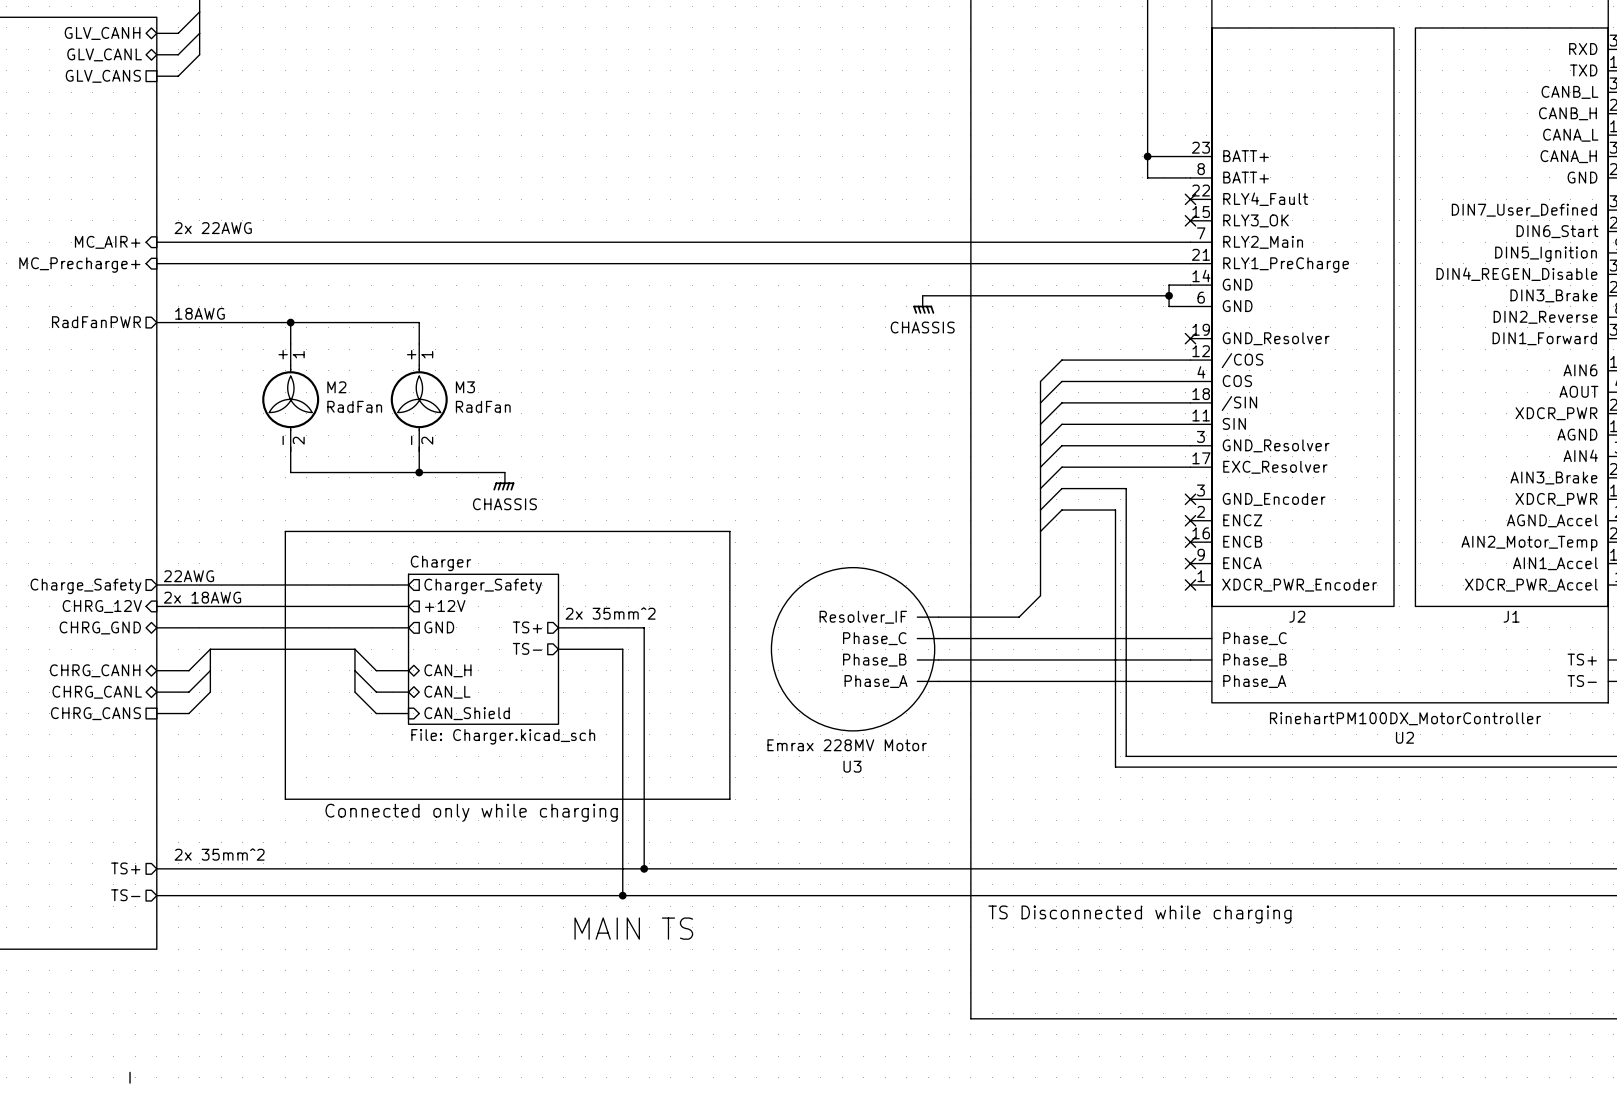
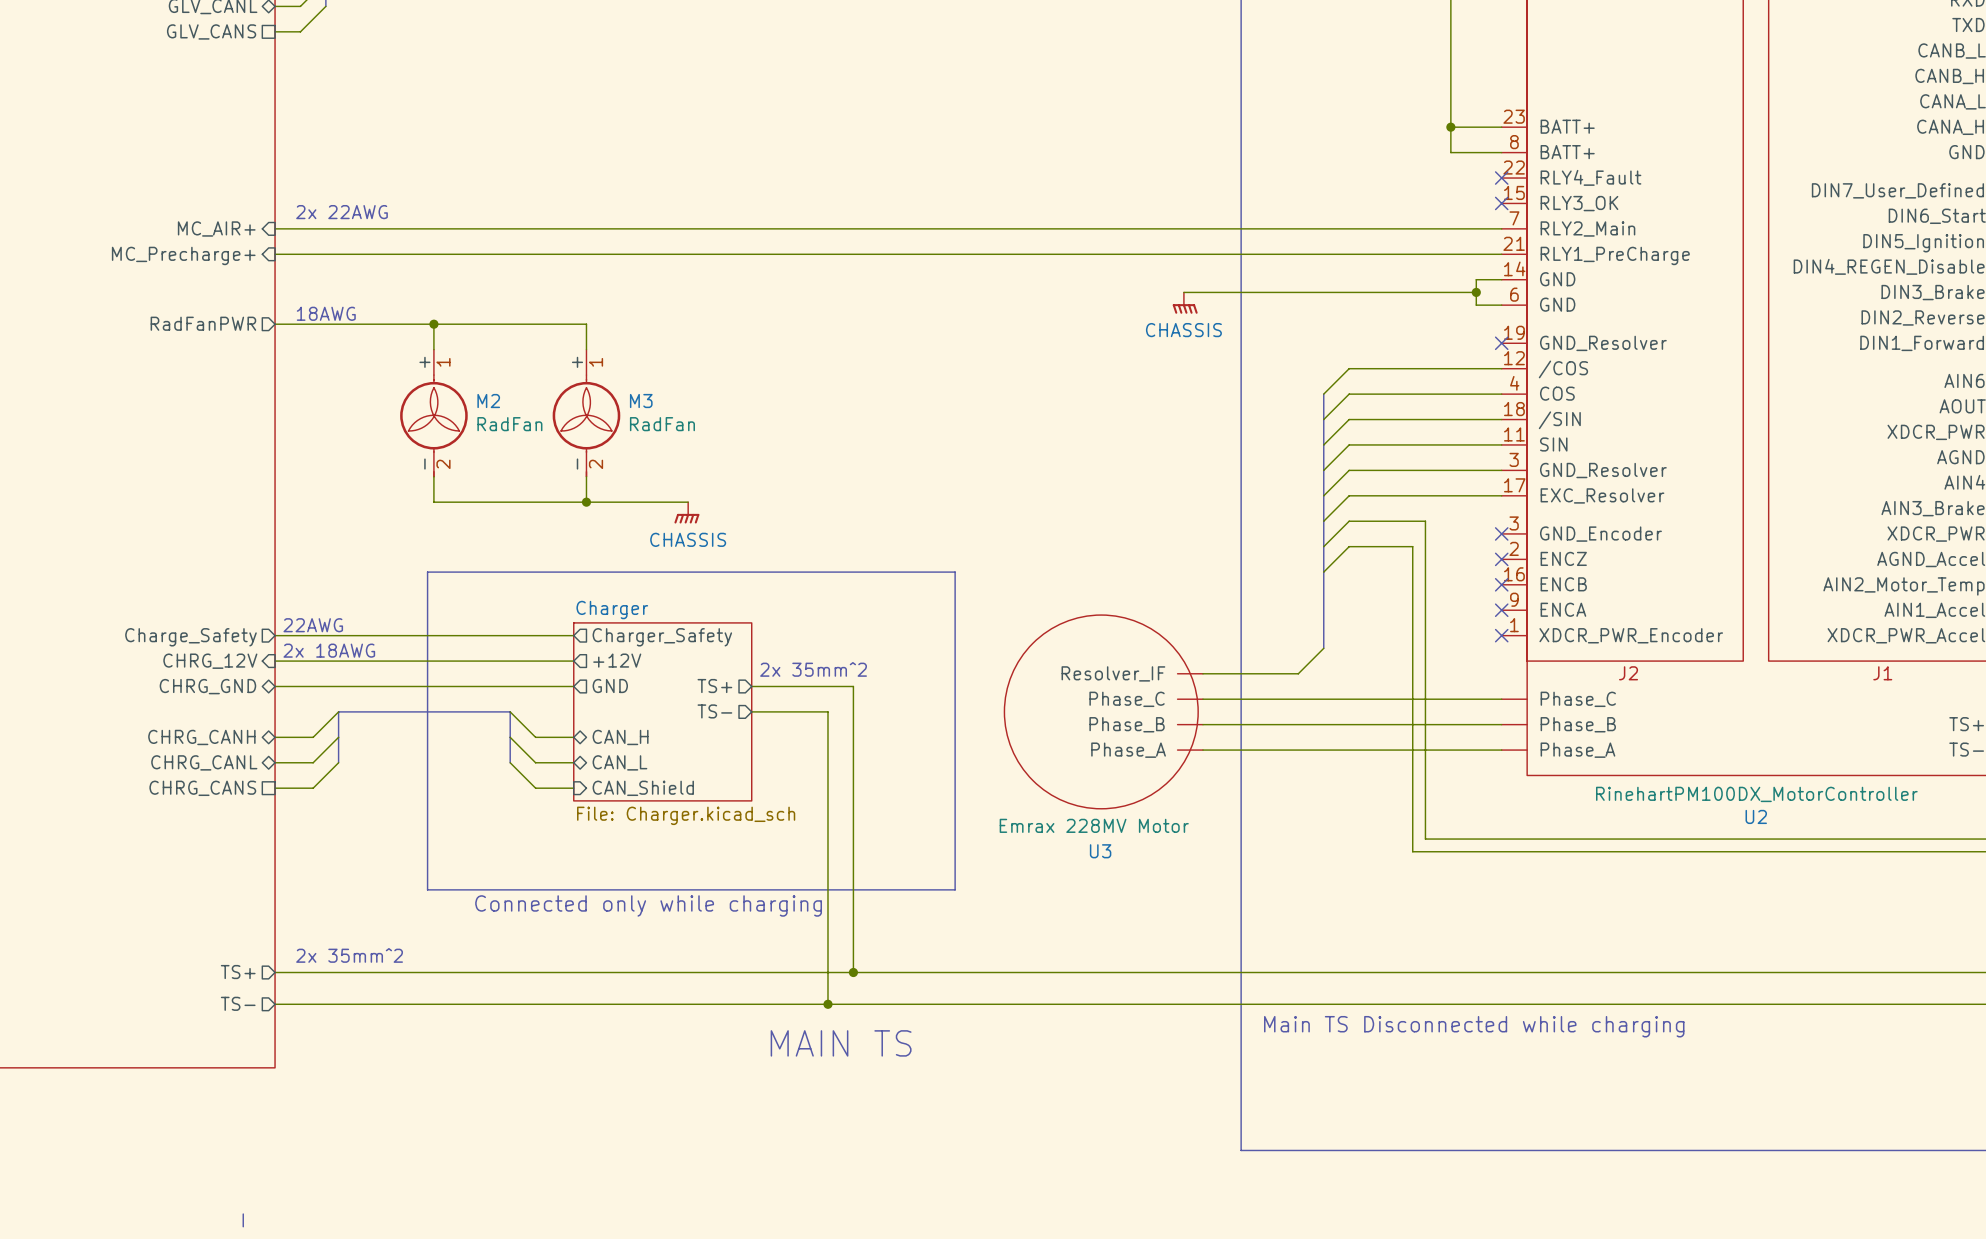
text: TS Disconnected while charging (1139, 914) -> Main TS Disconnected while charging (1474, 1026)

